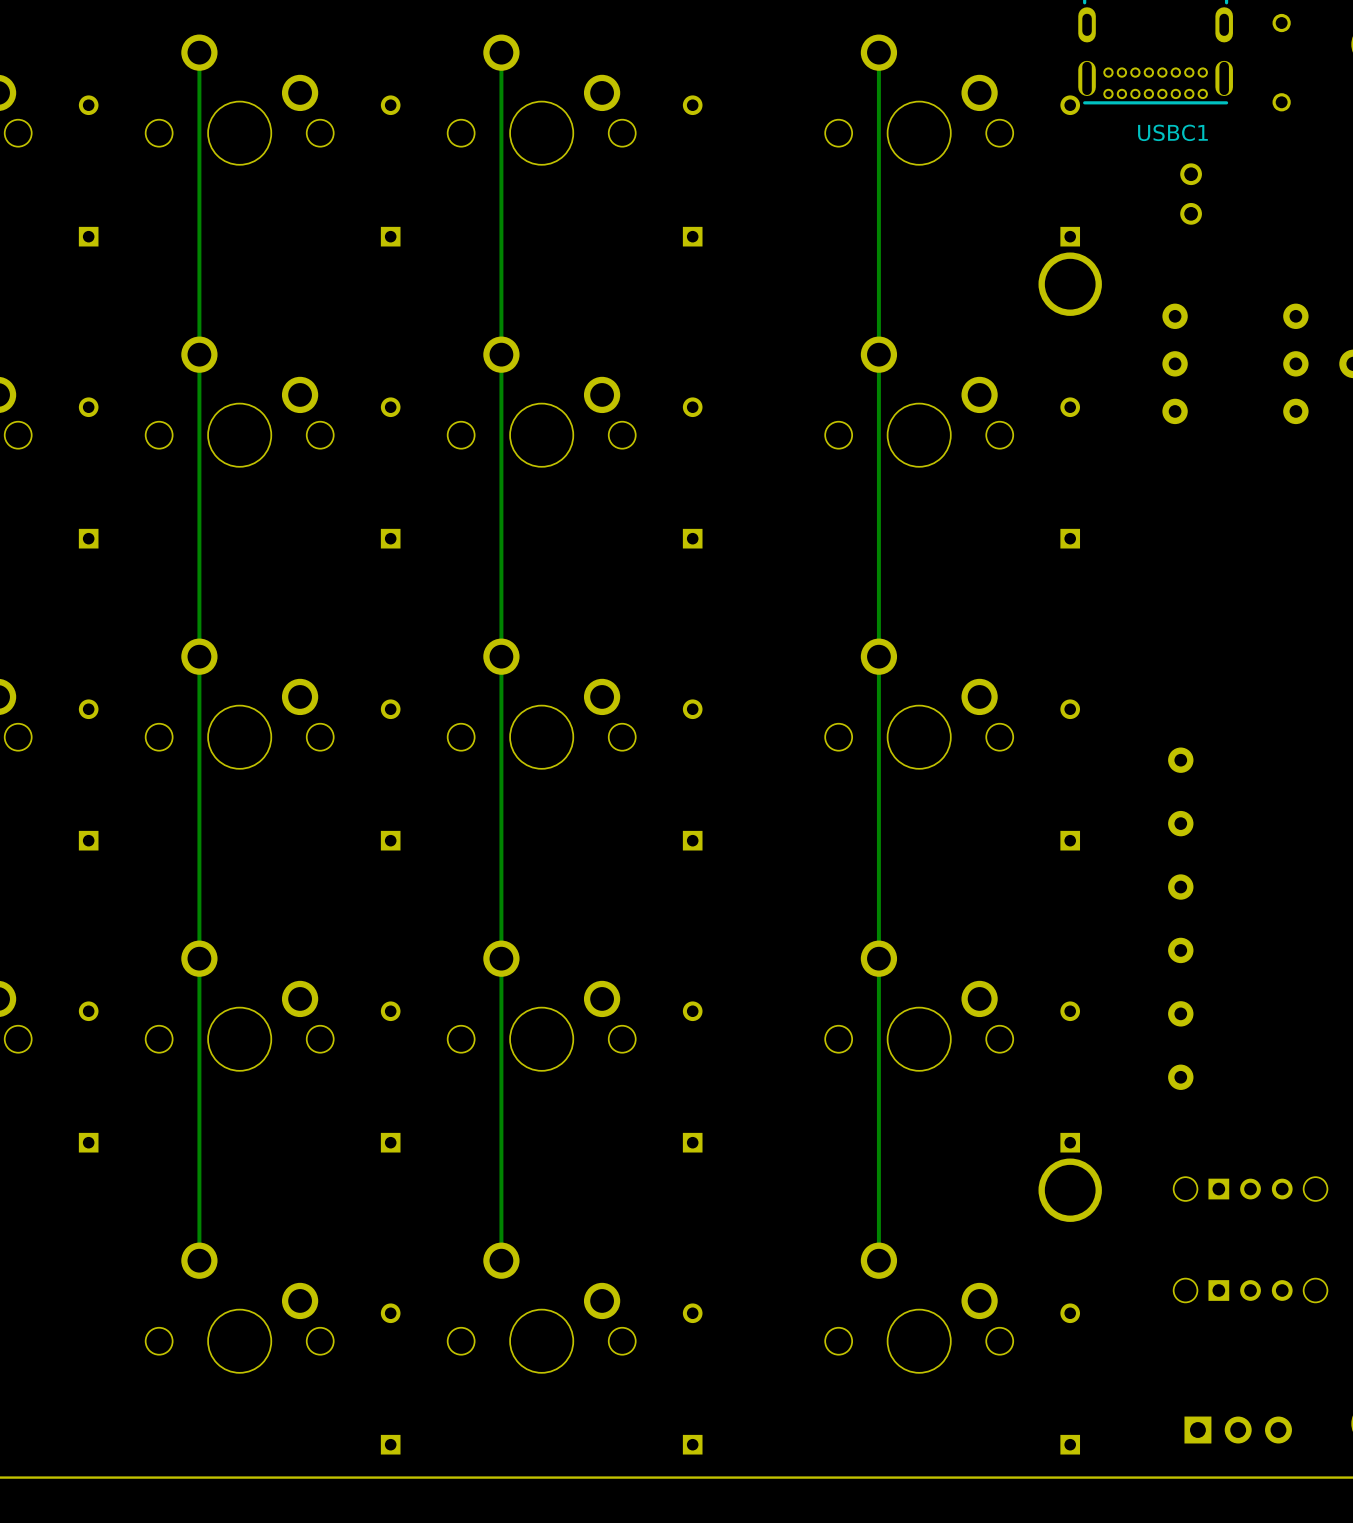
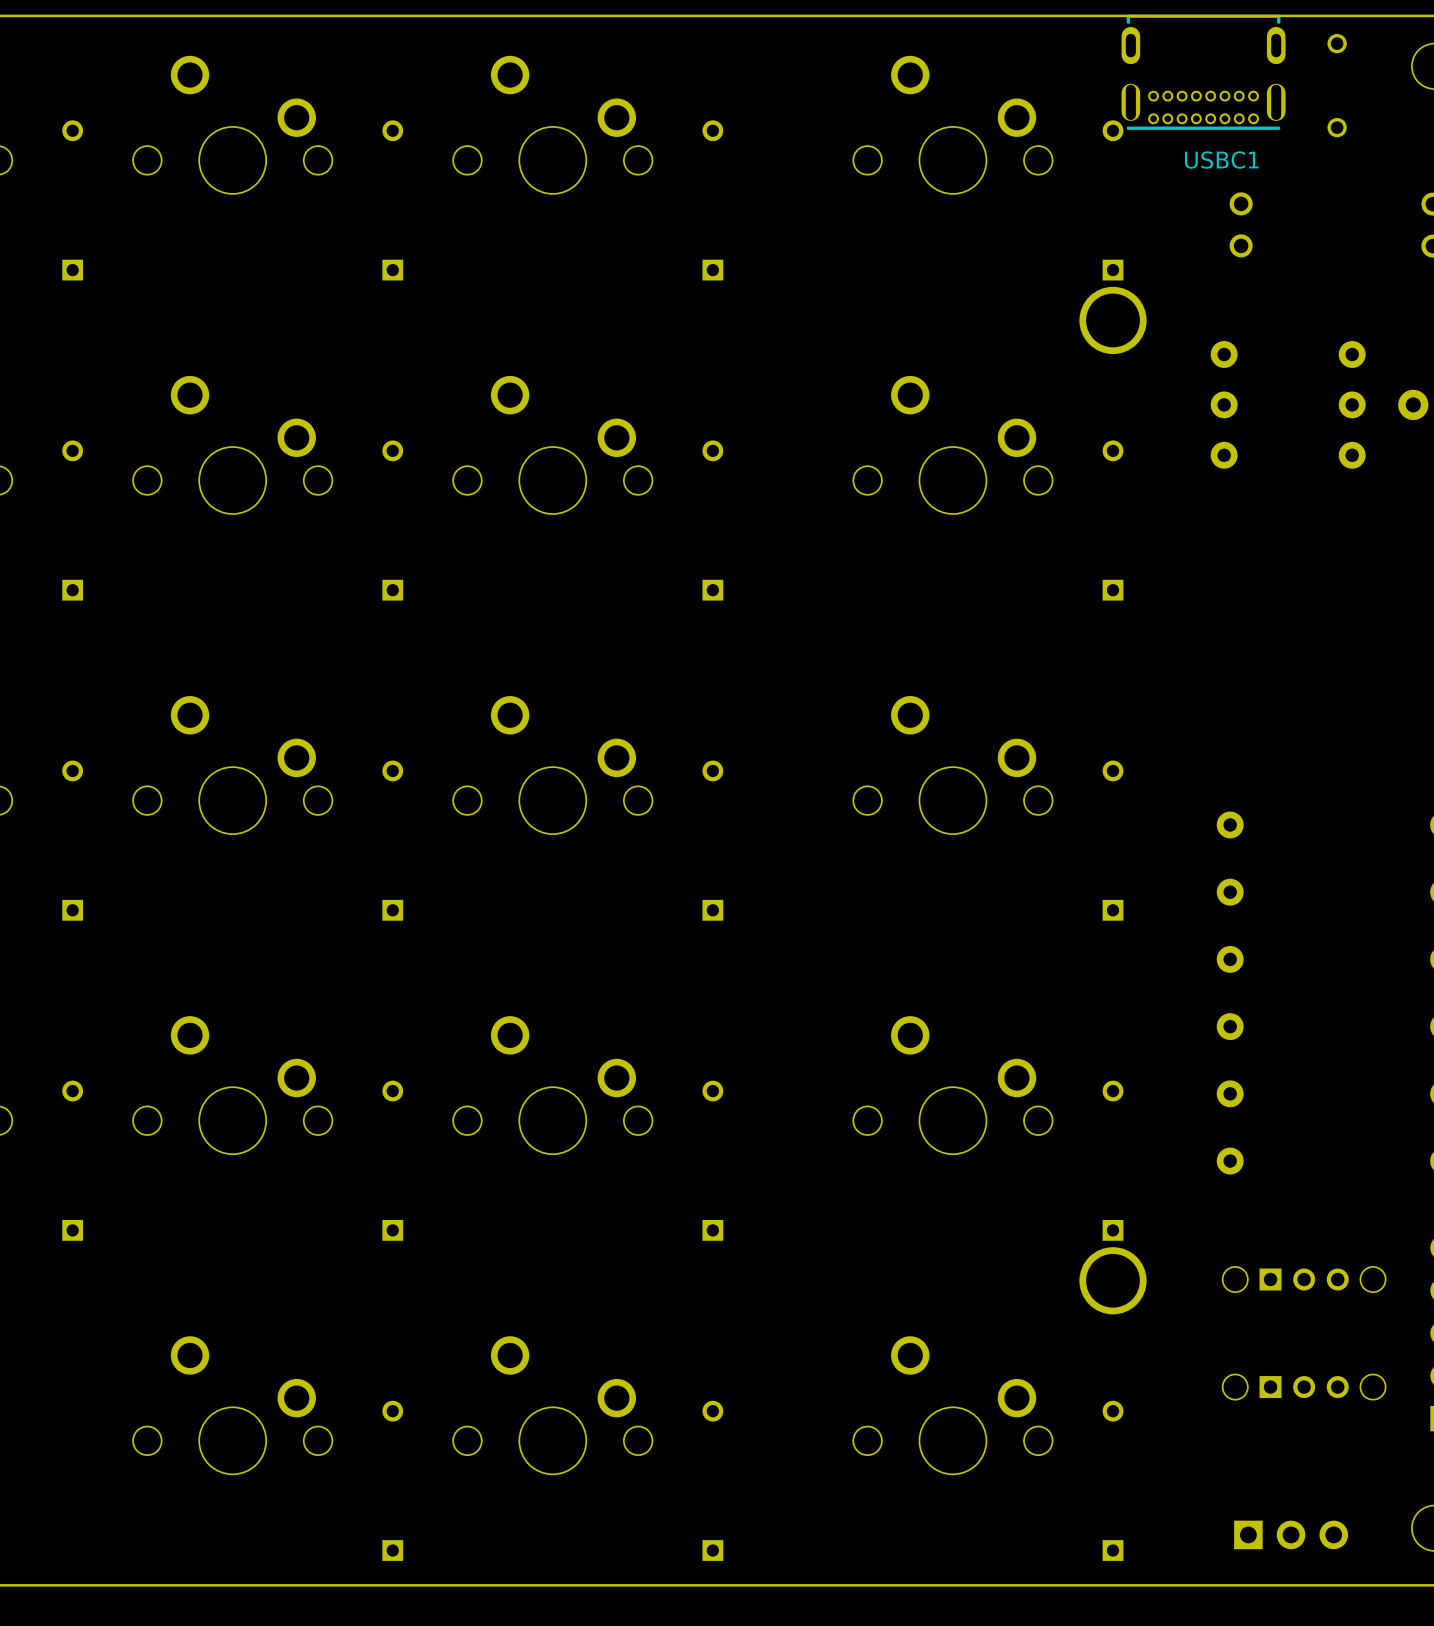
track: (199, 52) (199, 1260) -> none
track: (501, 52) (501, 1260) -> none
track: (878, 52) (878, 1260) -> none

